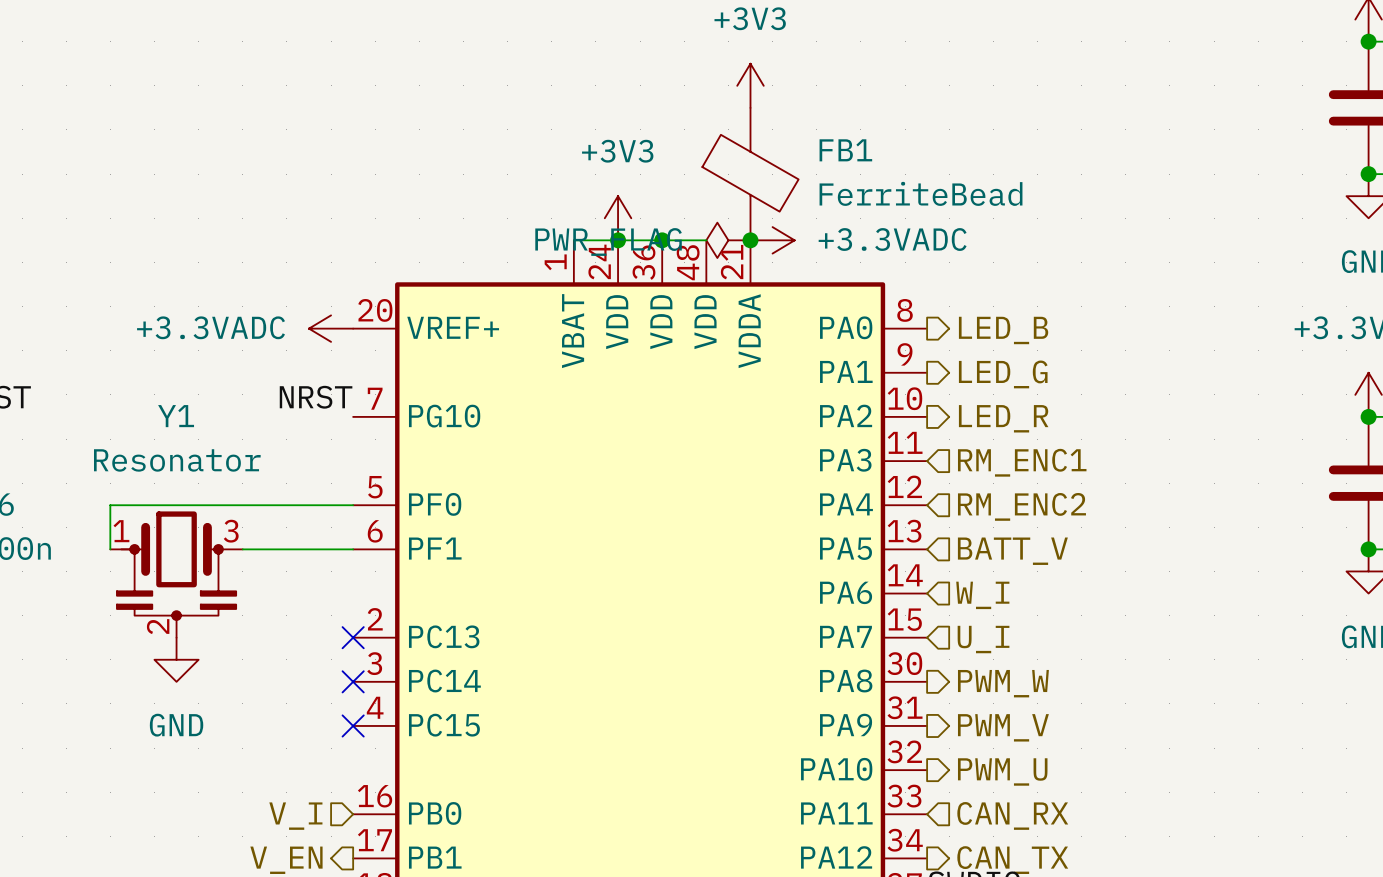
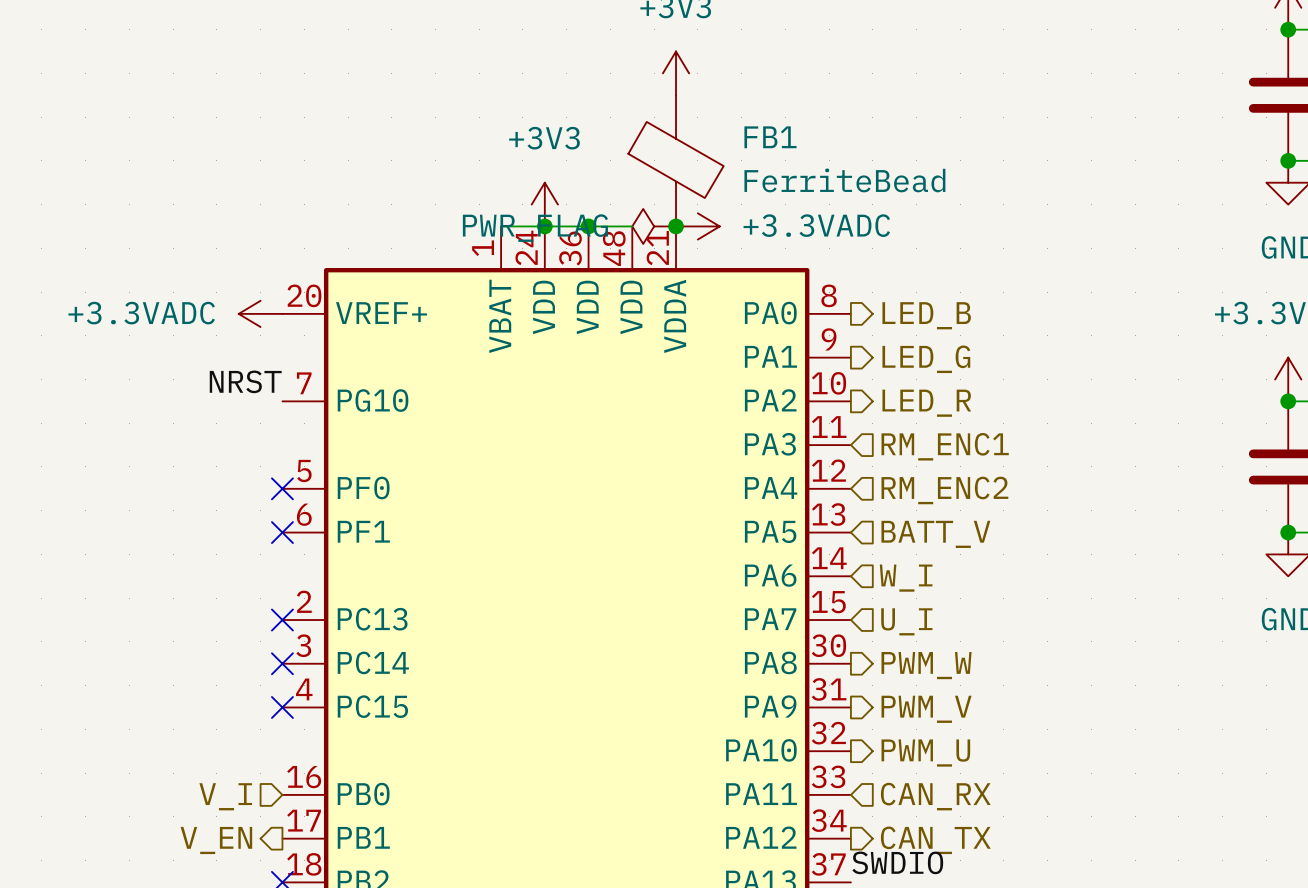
wire: (353, 505) (110, 505) (110, 549) -> none
no-connect mark: none -> (282, 488)
wire: (242, 549) (353, 549) -> none
no-connect mark: none -> (282, 532)
Y1: Resonator (176, 574) -> none
power symbol: GND (176, 659) -> none

